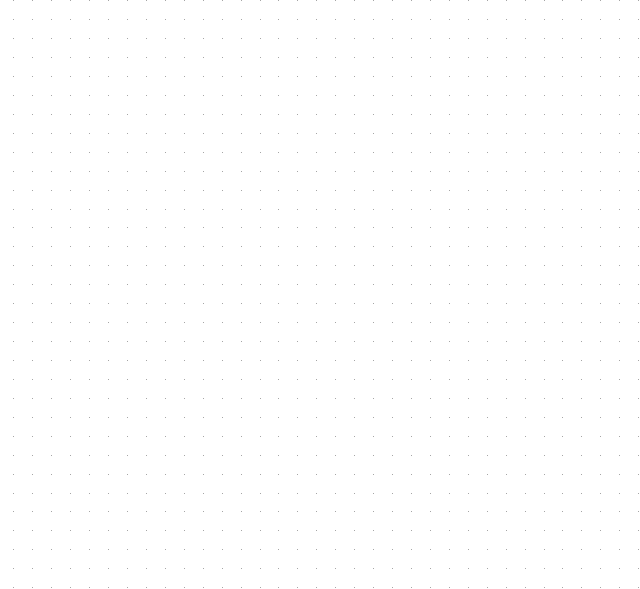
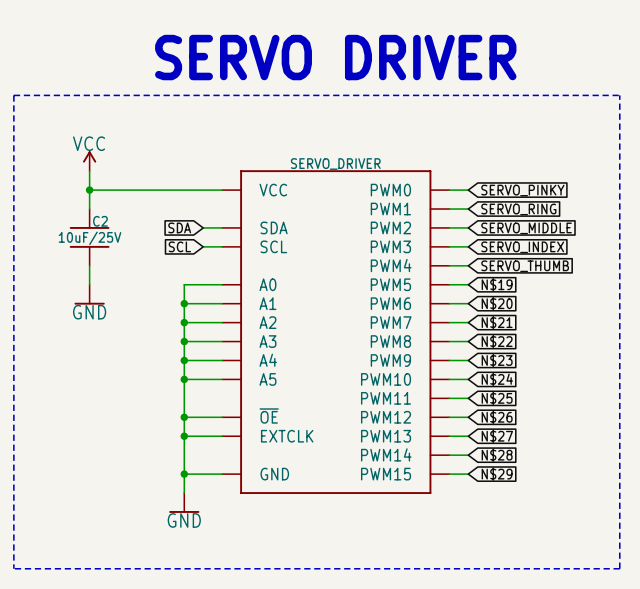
text: none -> SERVO DRIVER (335, 57)
line: none -> (13, 95) (13, 568) (619, 568) (619, 95) (13, 95)
power symbol: none -> VCC (89, 161)
wire: none -> (89, 171) (89, 209)
wire: none -> (89, 190) (222, 190)
junction: none -> (89, 190)
wire: none -> (449, 190) (468, 190)
global label: none -> SERVO_PINKY (522, 190)
wire: none -> (449, 209) (468, 209)
global label: none -> SERVO_RING (518, 209)
global label: none -> SDA (179, 227)
wire: none -> (203, 227) (222, 227)
wire: none -> (449, 227) (468, 227)
global label: none -> SERVO_MIDDLE (526, 228)
C2: none -> (89, 237)
global label: none -> SCL (179, 246)
wire: none -> (203, 246) (222, 246)
wire: none -> (449, 246) (468, 246)
global label: none -> SERVO_INDEX (522, 247)
wire: none -> (89, 265) (89, 284)
wire: none -> (449, 265) (468, 265)
global label: none -> SERVO_THUMB (525, 266)
wire: none -> (222, 284) (184, 284) (184, 493)
wire: none -> (449, 284) (468, 284)
global label: none -> N$19 (497, 284)
power symbol: none -> GND (89, 294)
wire: none -> (184, 303) (222, 303)
junction: none -> (184, 303)
wire: none -> (449, 303) (468, 303)
global label: none -> N$20 (497, 303)
wire: none -> (184, 322) (222, 322)
junction: none -> (184, 322)
wire: none -> (449, 322) (468, 322)
global label: none -> N$21 (497, 322)
SERVO_DRIVER: none -> (335, 332)
wire: none -> (184, 341) (222, 341)
junction: none -> (184, 341)
wire: none -> (449, 341) (468, 341)
global label: none -> N$22 (497, 341)
wire: none -> (184, 360) (222, 360)
junction: none -> (184, 360)
wire: none -> (449, 360) (468, 360)
global label: none -> N$23 (497, 360)
wire: none -> (184, 379) (222, 379)
junction: none -> (184, 379)
wire: none -> (449, 379) (468, 379)
global label: none -> N$24 (497, 379)
wire: none -> (449, 398) (468, 398)
global label: none -> N$25 (497, 398)
wire: none -> (184, 417) (222, 417)
junction: none -> (184, 417)
wire: none -> (449, 417) (468, 417)
global label: none -> N$26 (497, 417)
wire: none -> (184, 436) (222, 436)
junction: none -> (184, 436)
wire: none -> (449, 436) (468, 436)
global label: none -> N$27 (497, 436)
wire: none -> (449, 455) (468, 455)
global label: none -> N$28 (497, 455)
wire: none -> (184, 474) (222, 474)
junction: none -> (184, 474)
wire: none -> (449, 474) (468, 474)
global label: none -> N$29 (497, 474)
power symbol: none -> GND (184, 502)

